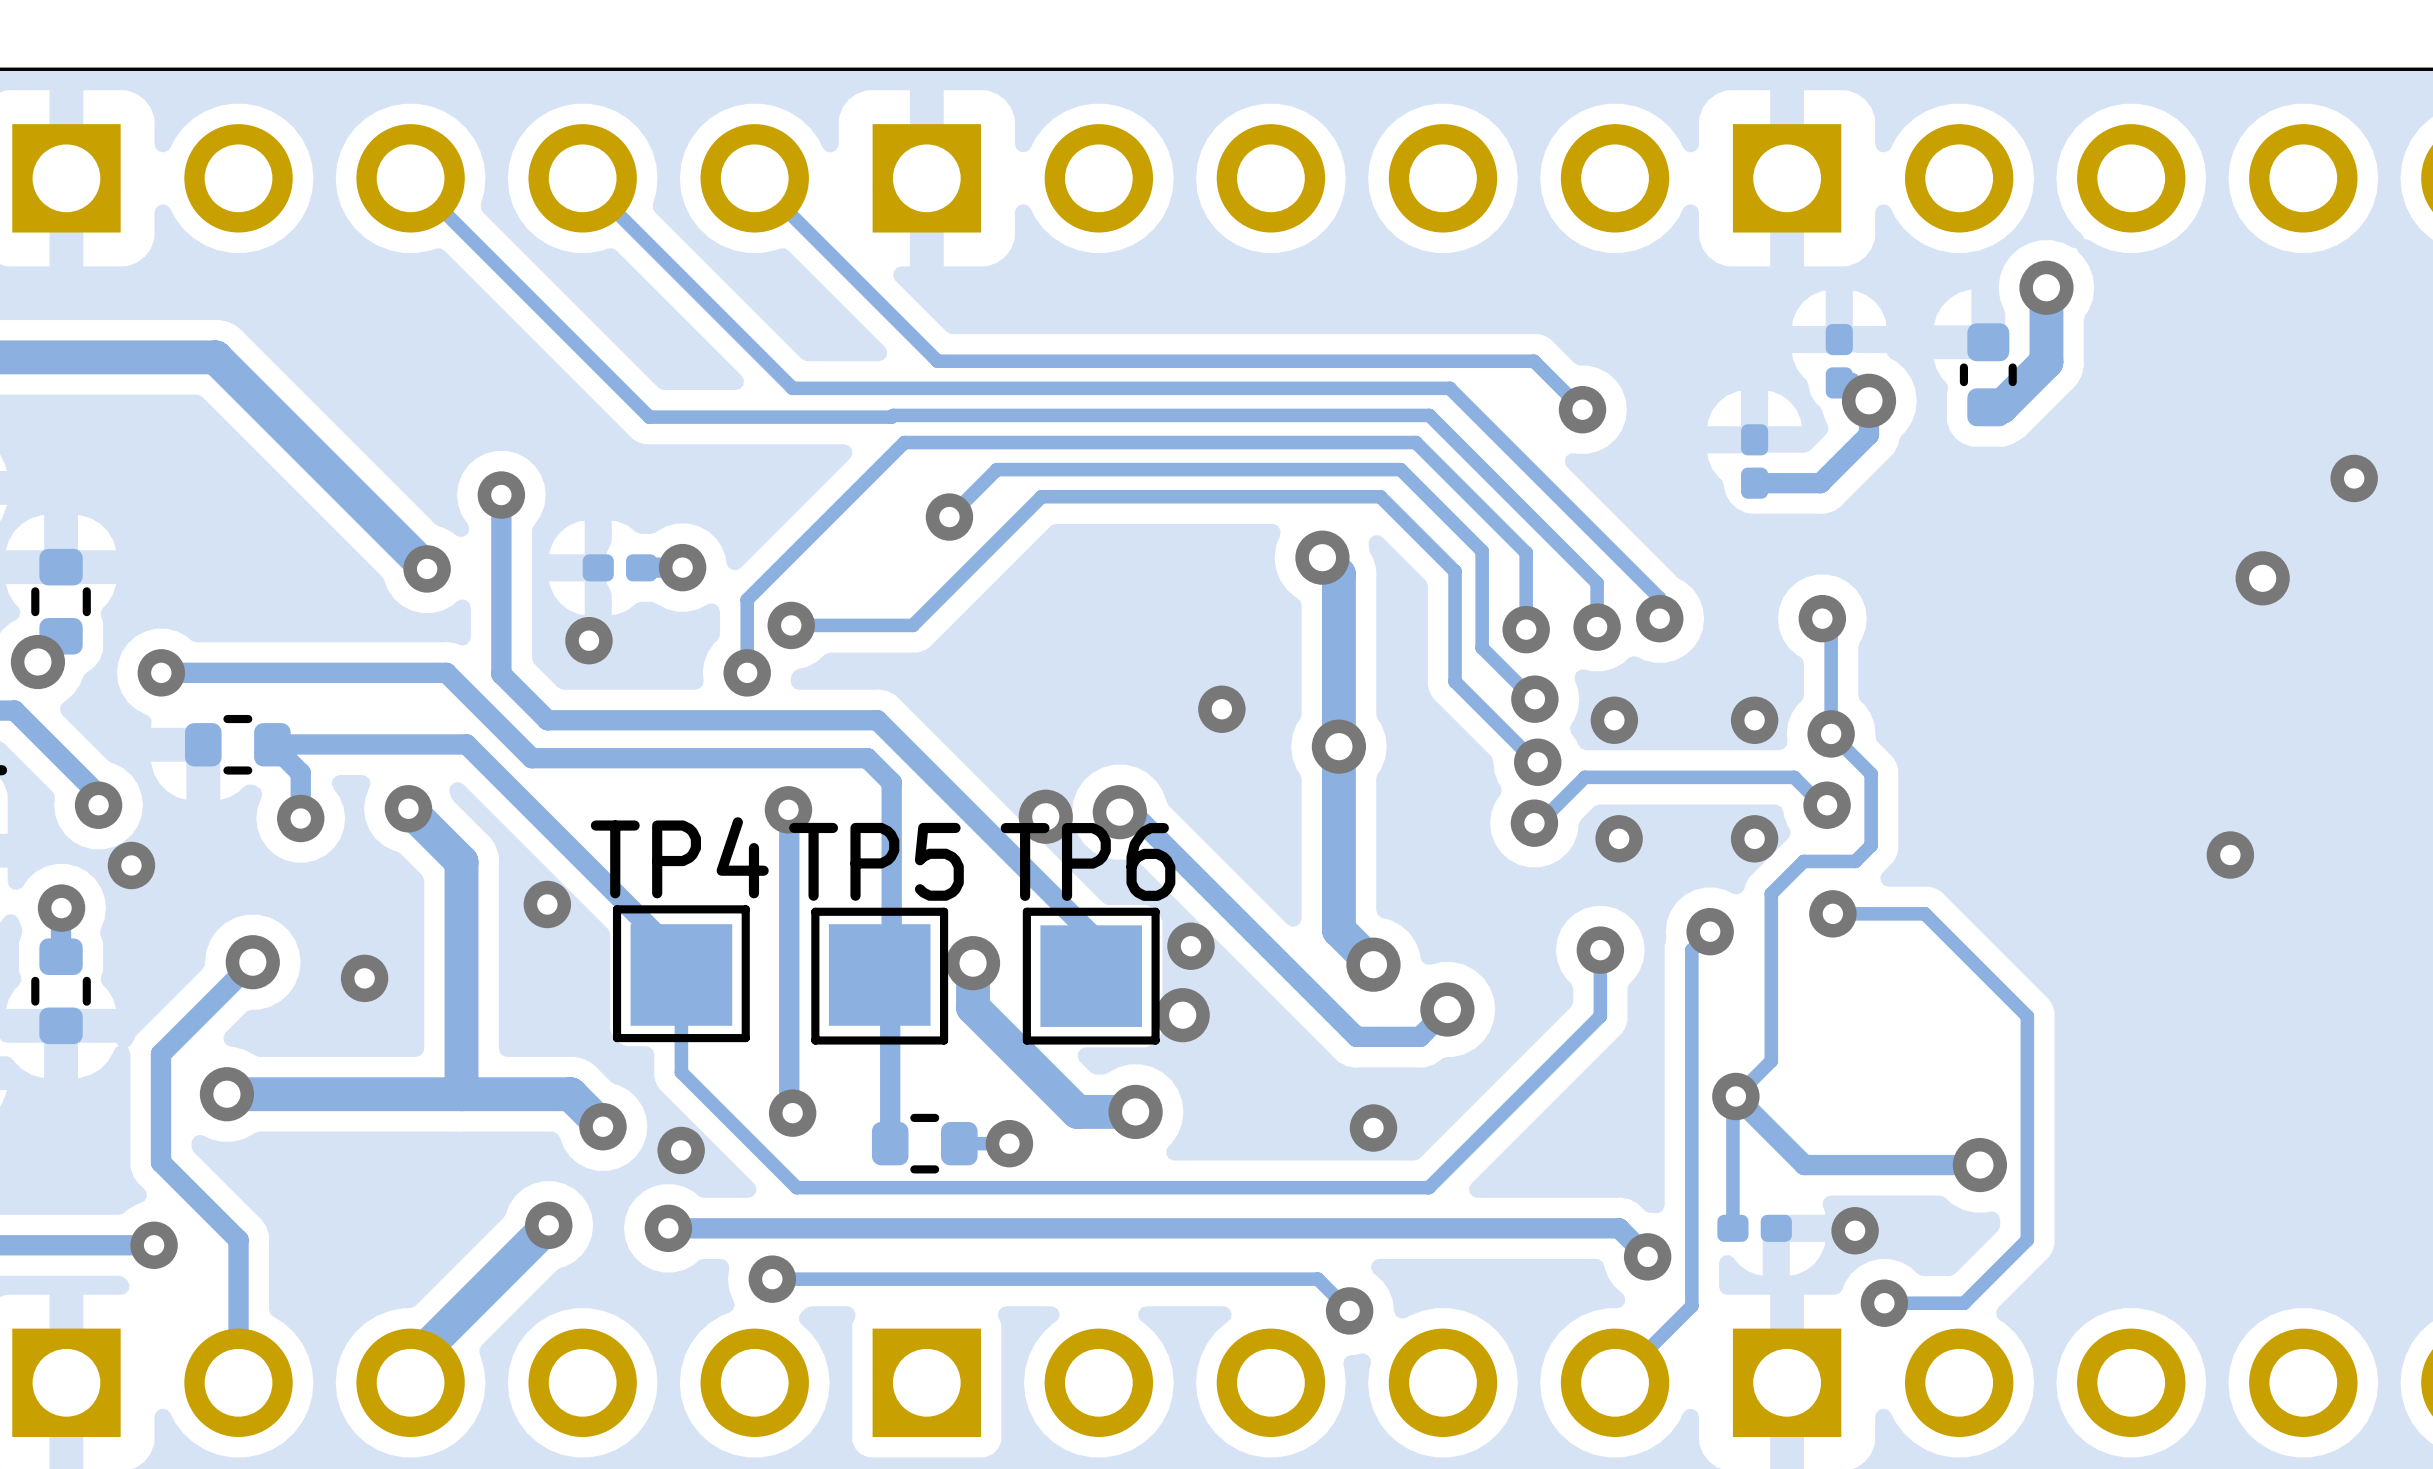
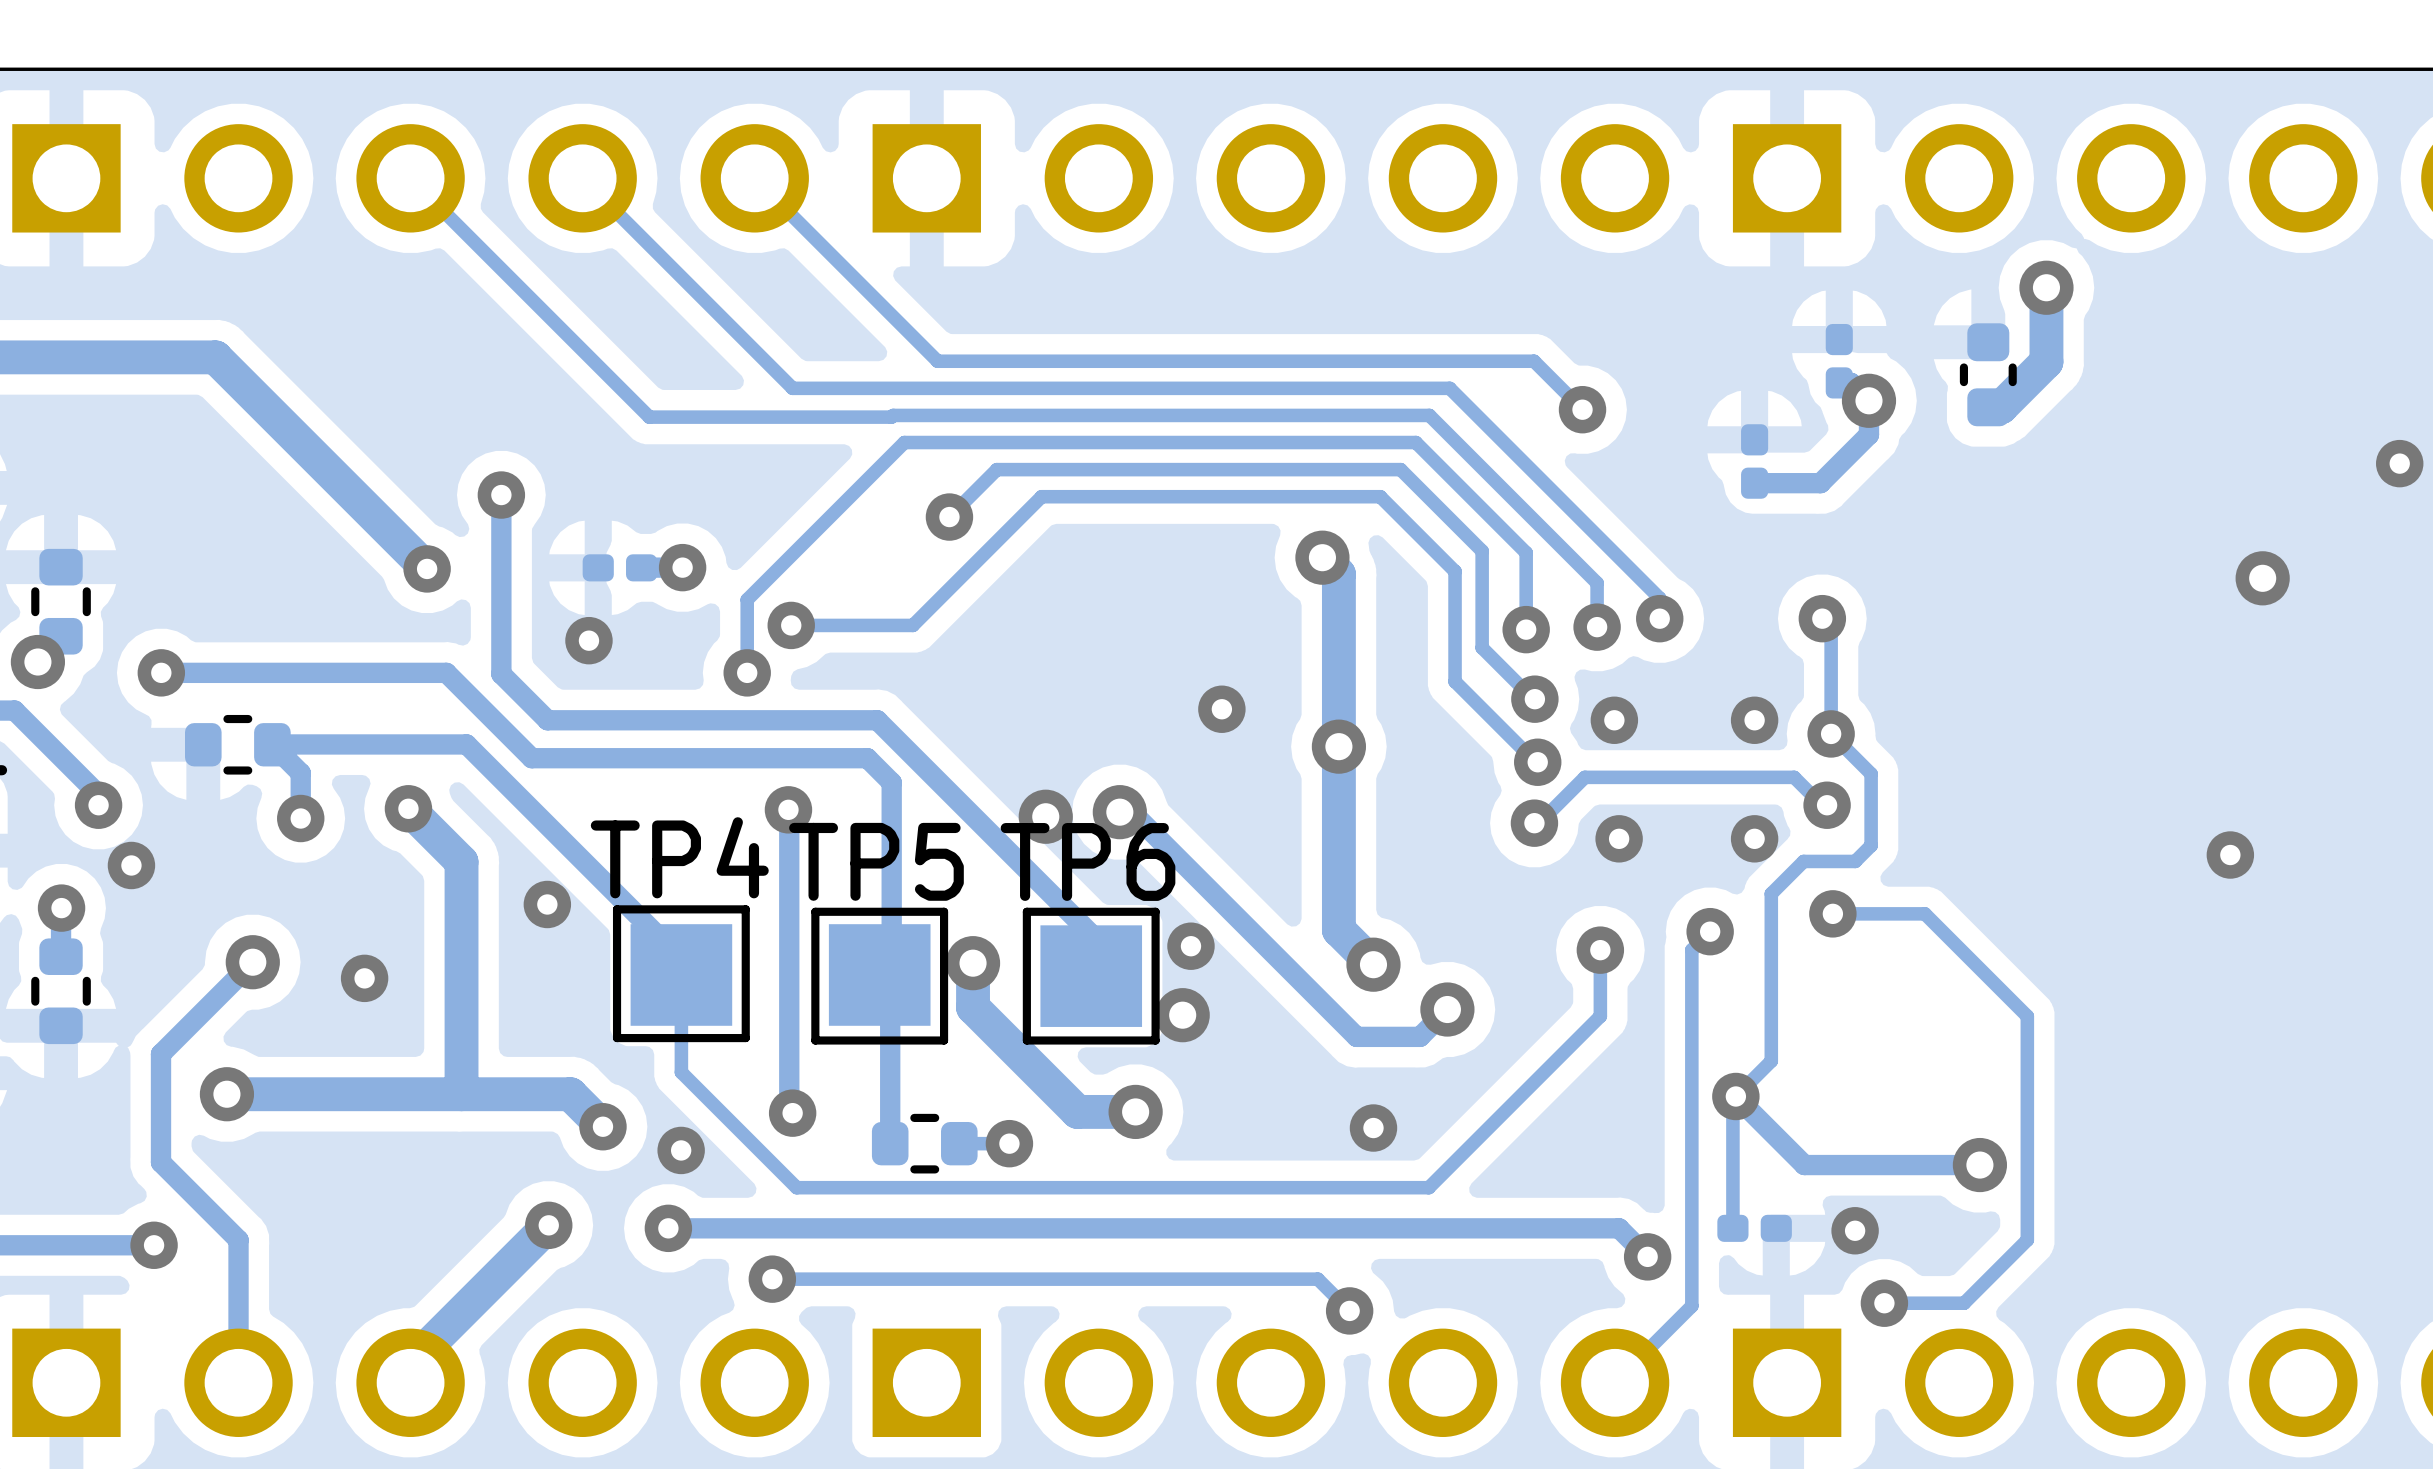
via position: (2354, 478) -> (2399, 463)

